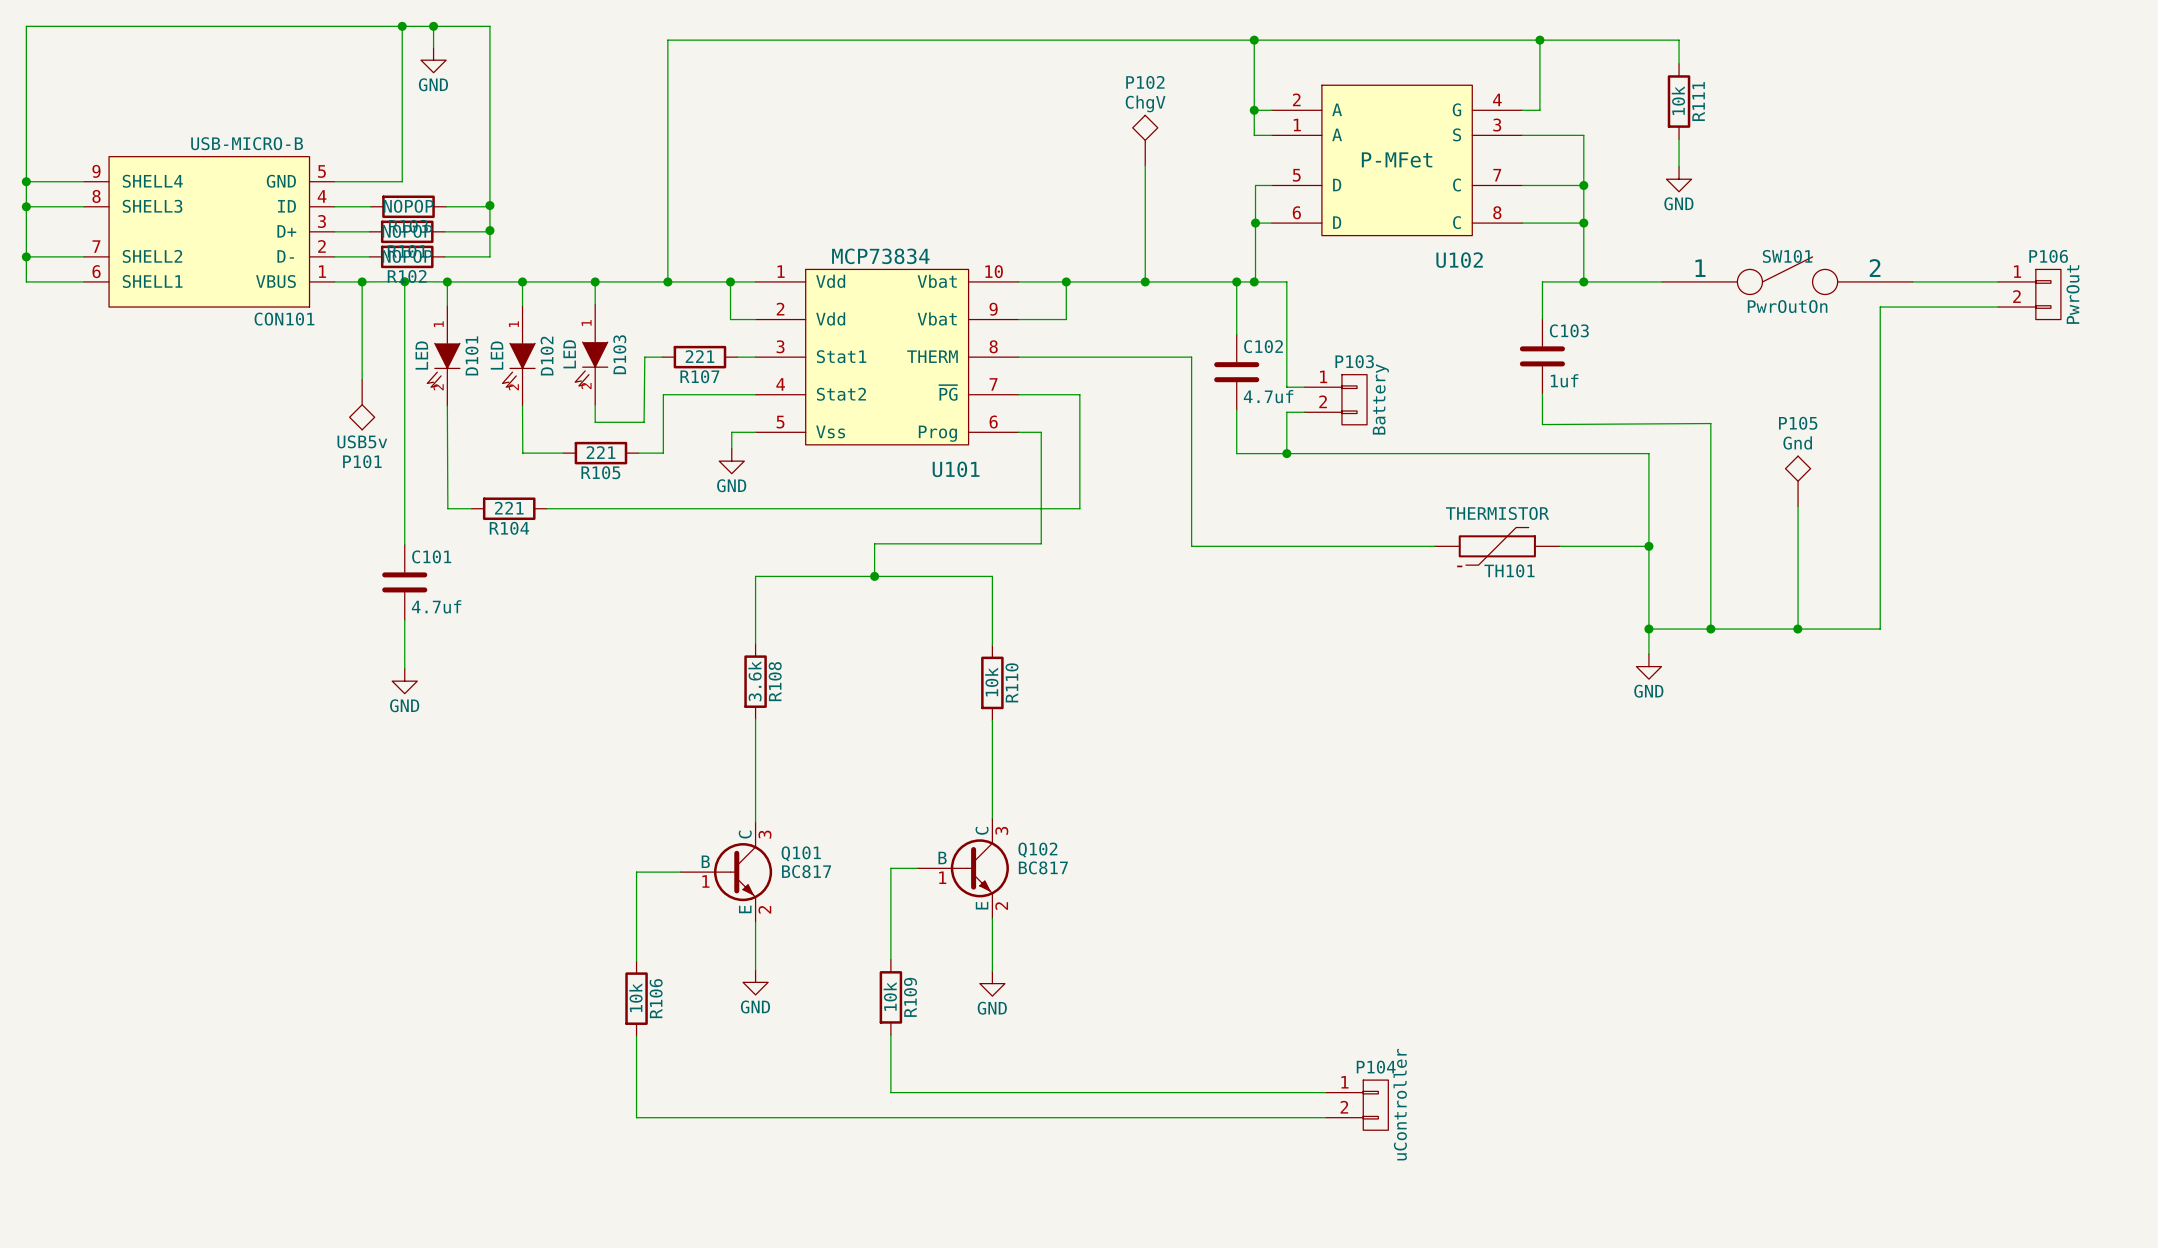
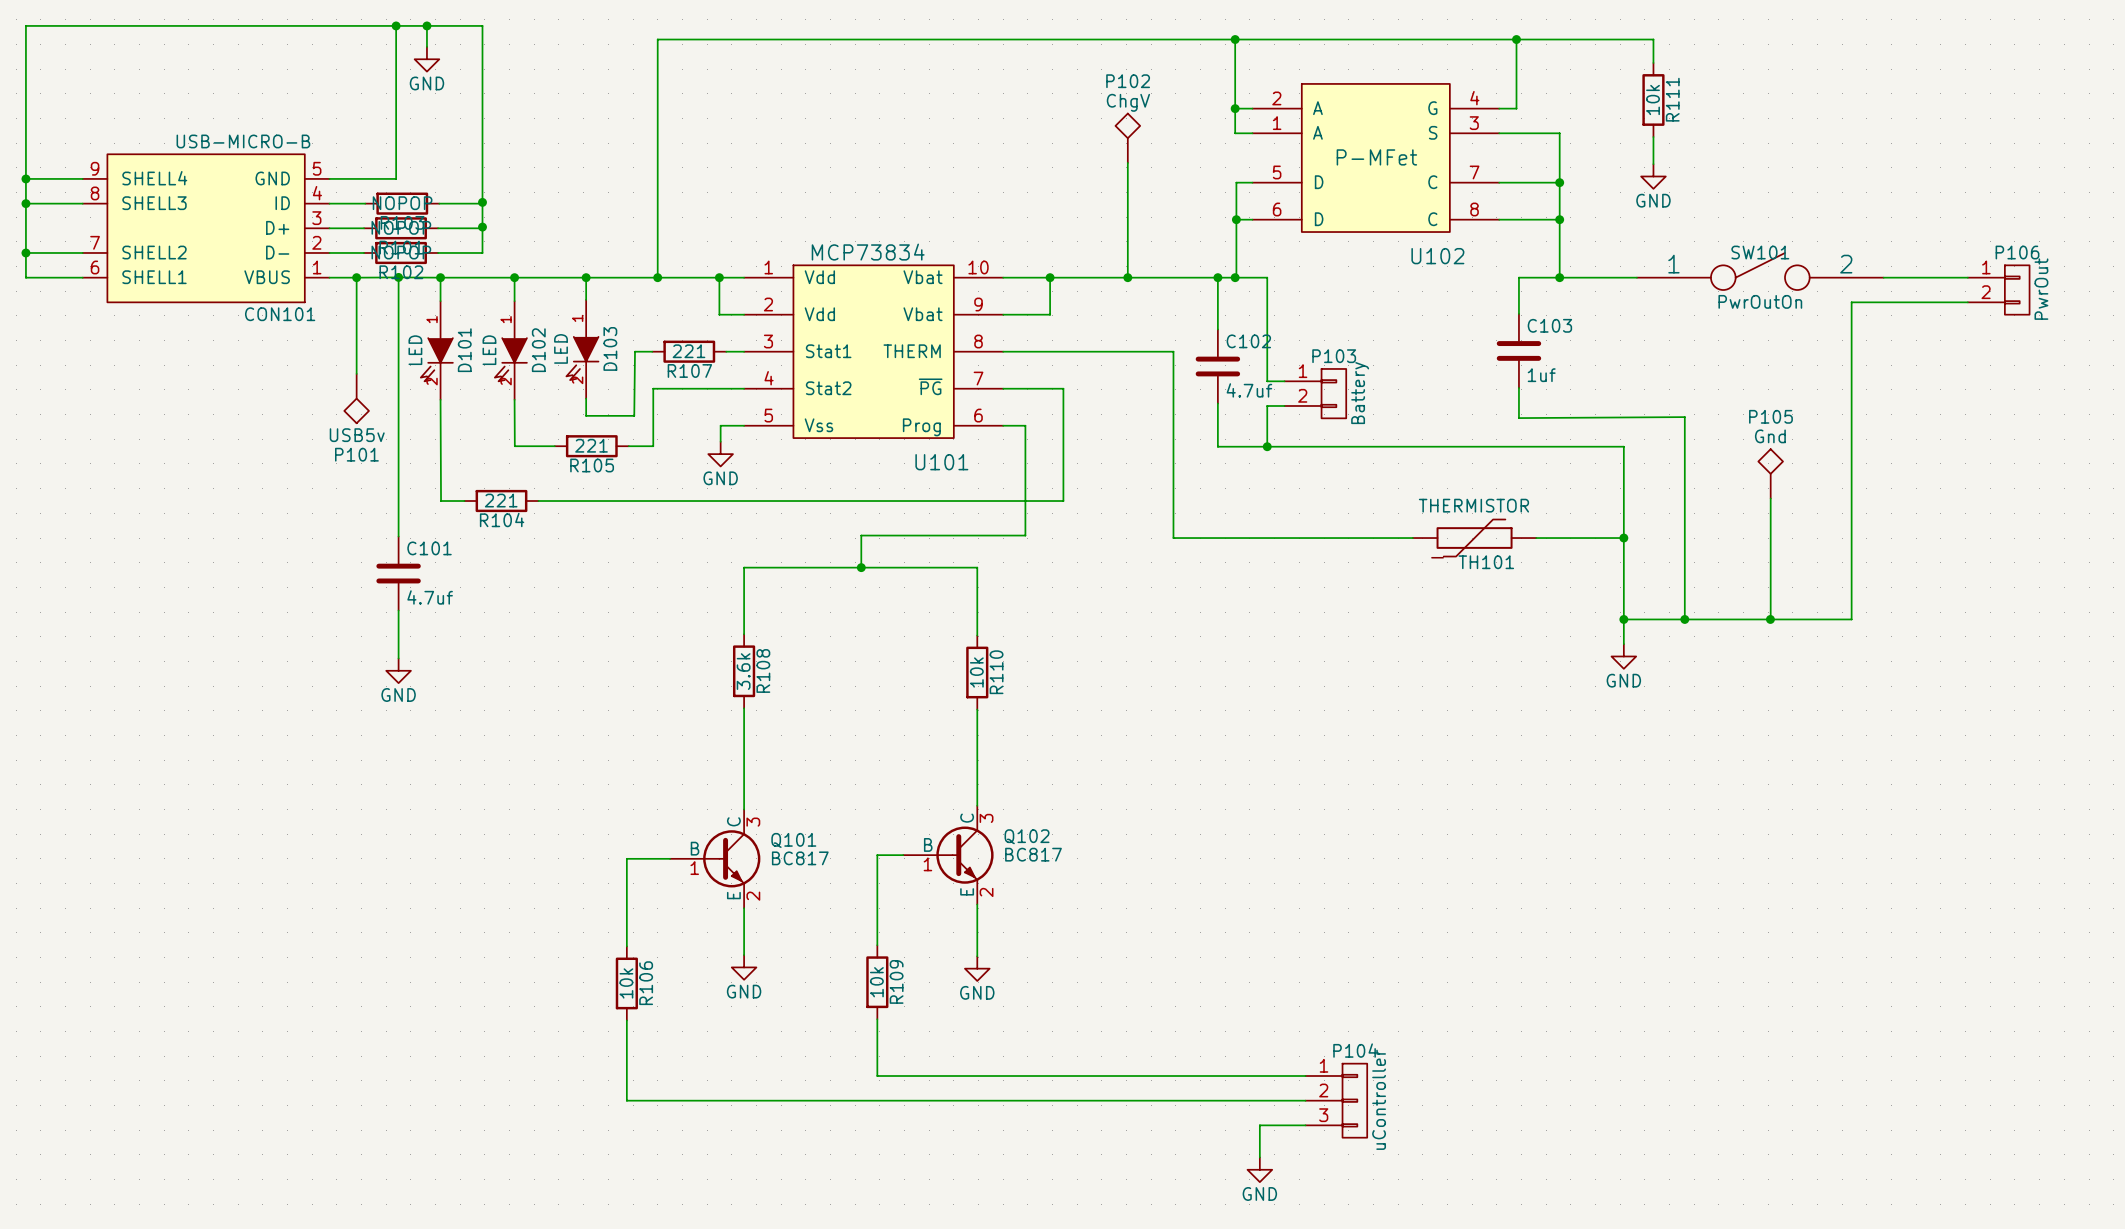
P104 symbol: [1325, 1080, 1389, 1131] -> [1305, 1063, 1368, 1138]
wire: none -> (1305, 1125) (1259, 1125) (1259, 1157)
power symbol: none -> GND (1259, 1169)

